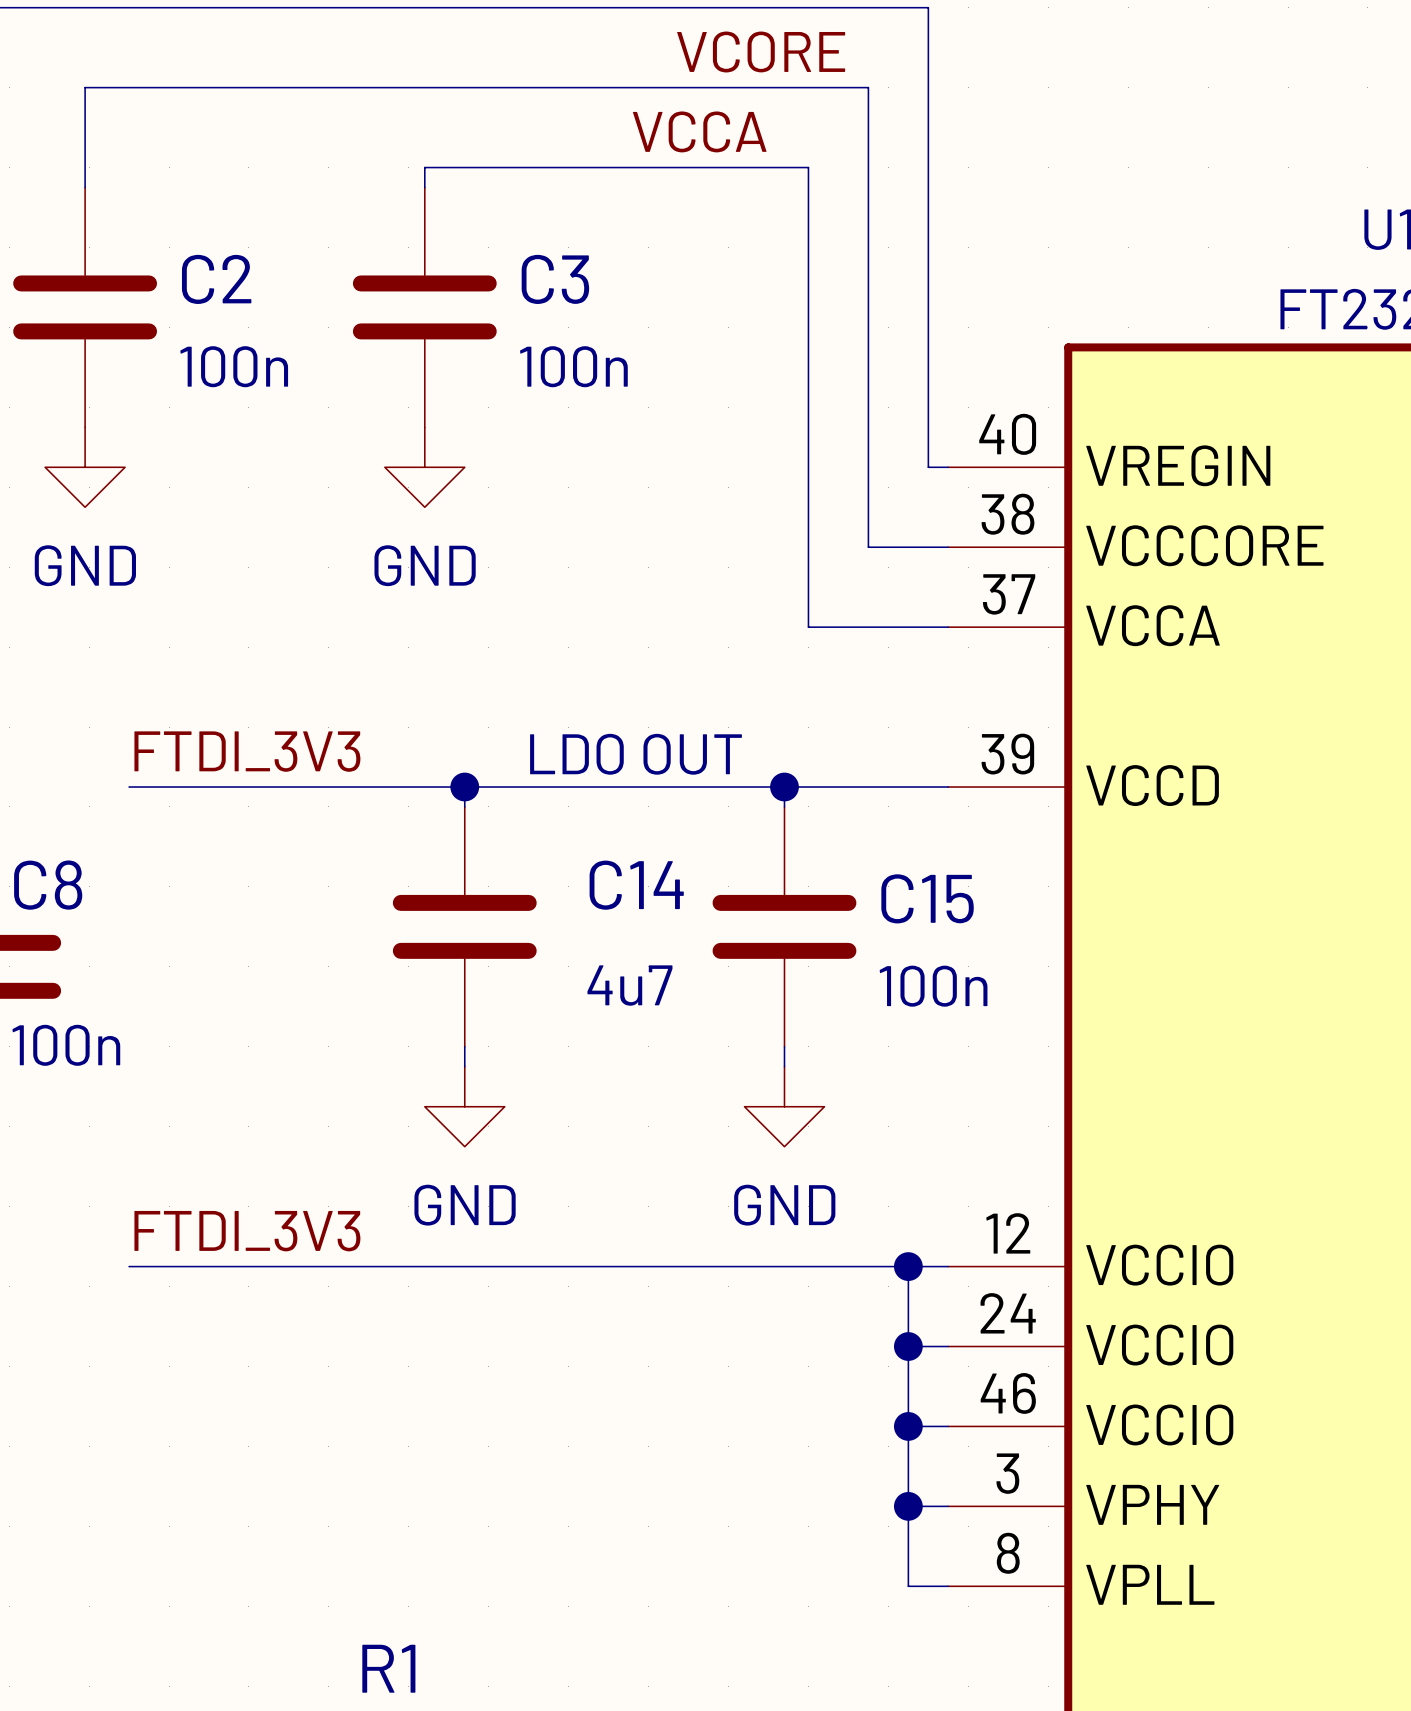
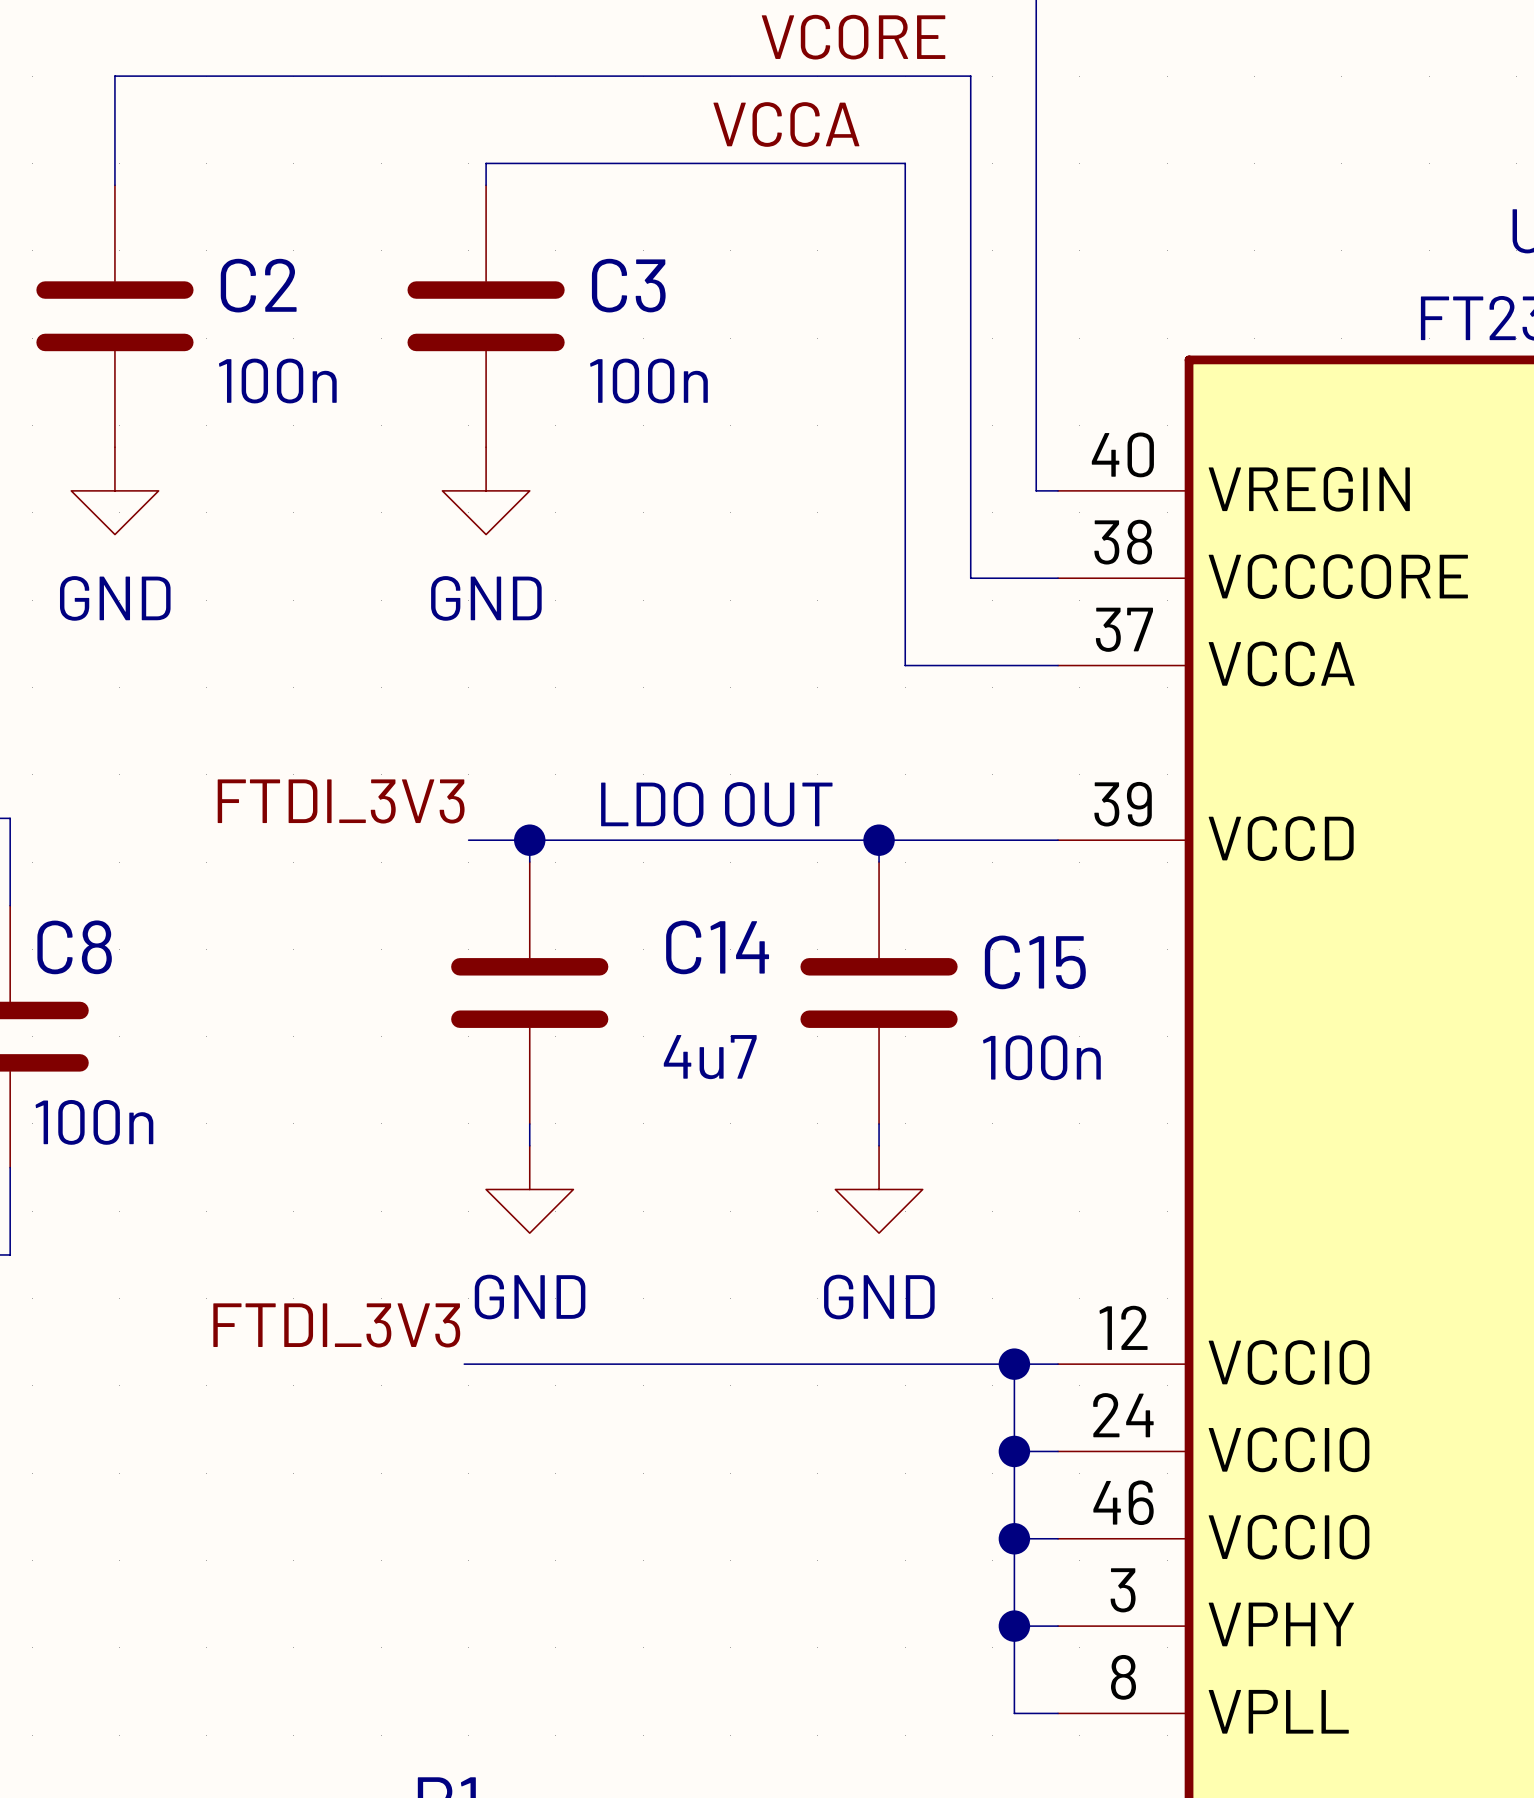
label position: FTDI_3V3 (247, 751) -> FTDI_3V3 (341, 801)
wire: (129, 787) (408, 787) -> none
label position: FTDI_3V3 (247, 1231) -> FTDI_3V3 (336, 1325)
wire: (129, 1266) (404, 1266) -> none

